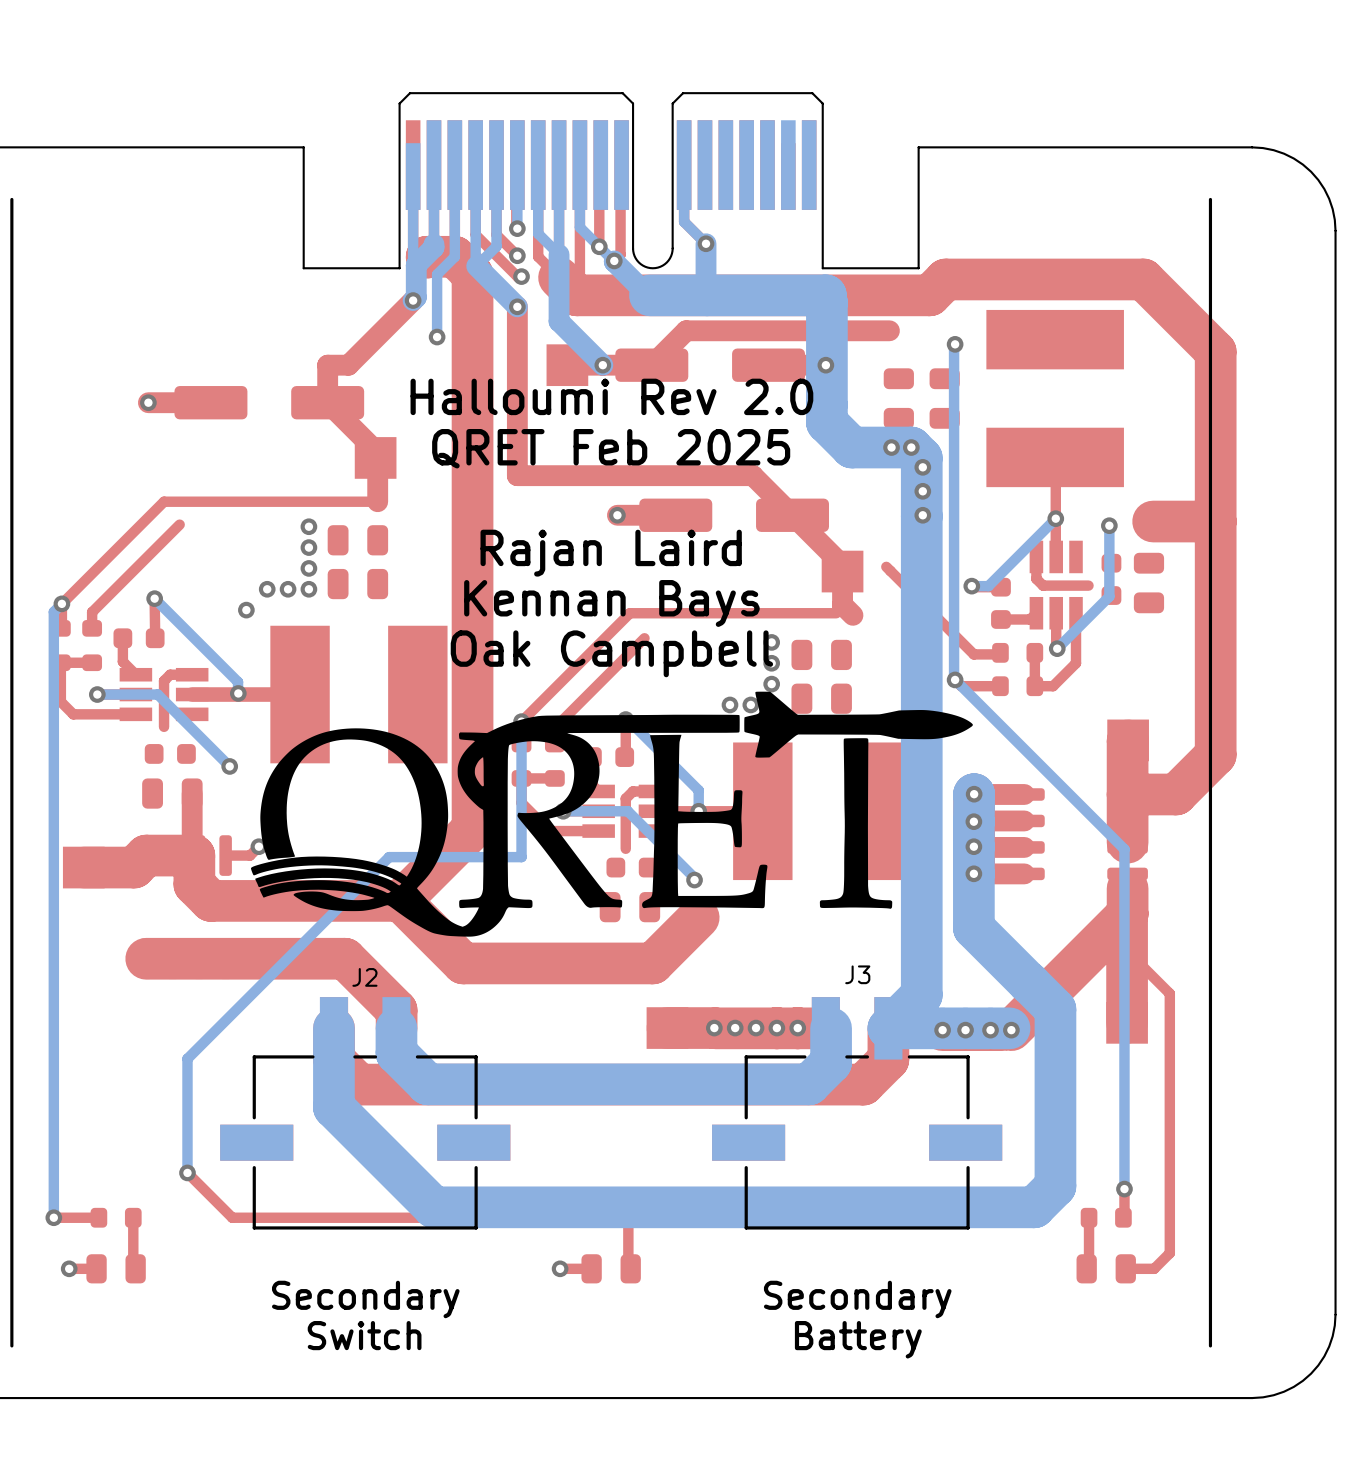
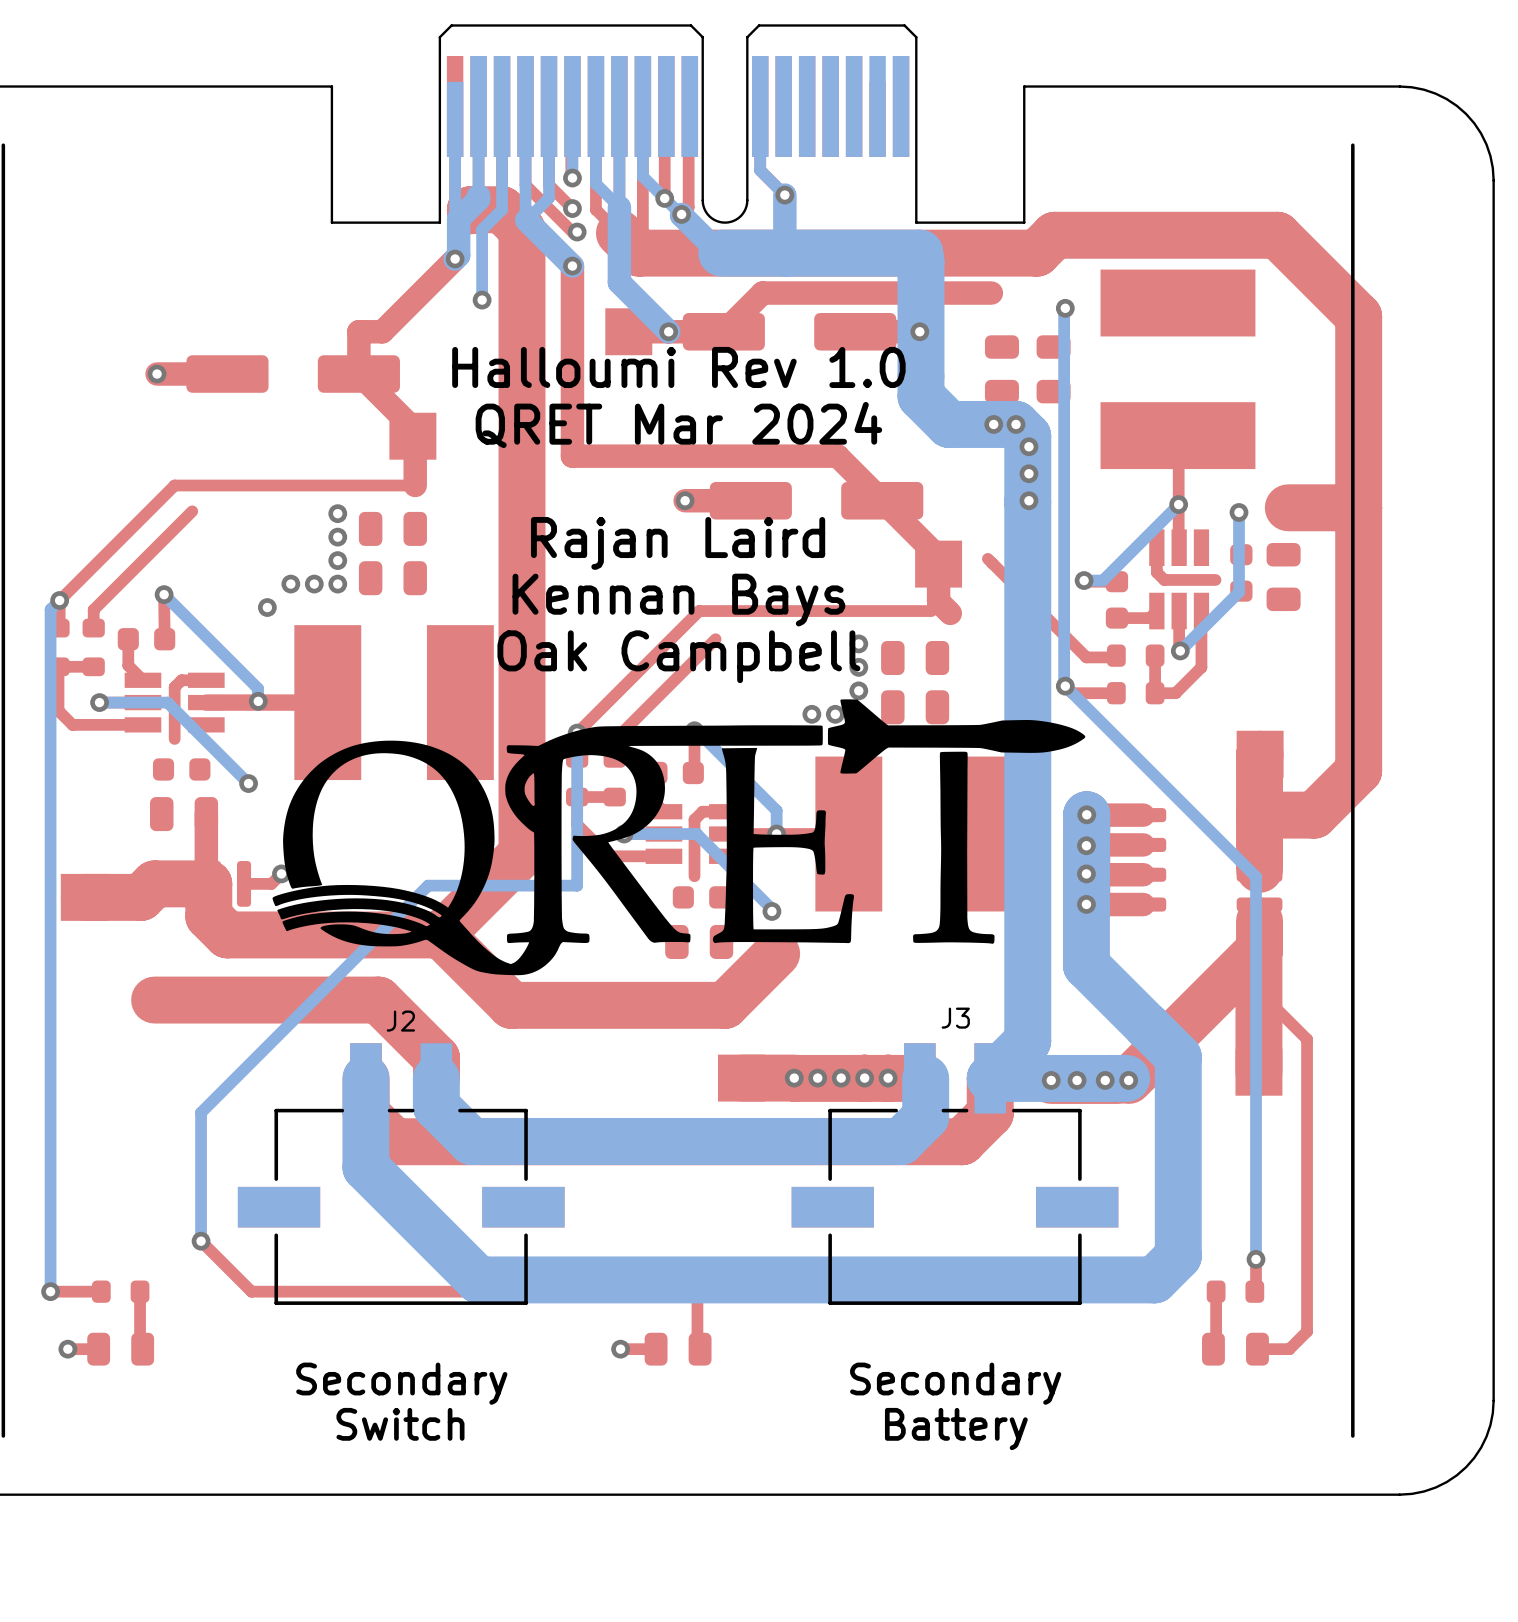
text: Halloumi Rev 2.0 (611, 396) -> Halloumi Rev 1.0 (678, 367)
text: QRET Feb 2025 (611, 448) -> QRET Mar 2024 (678, 424)

